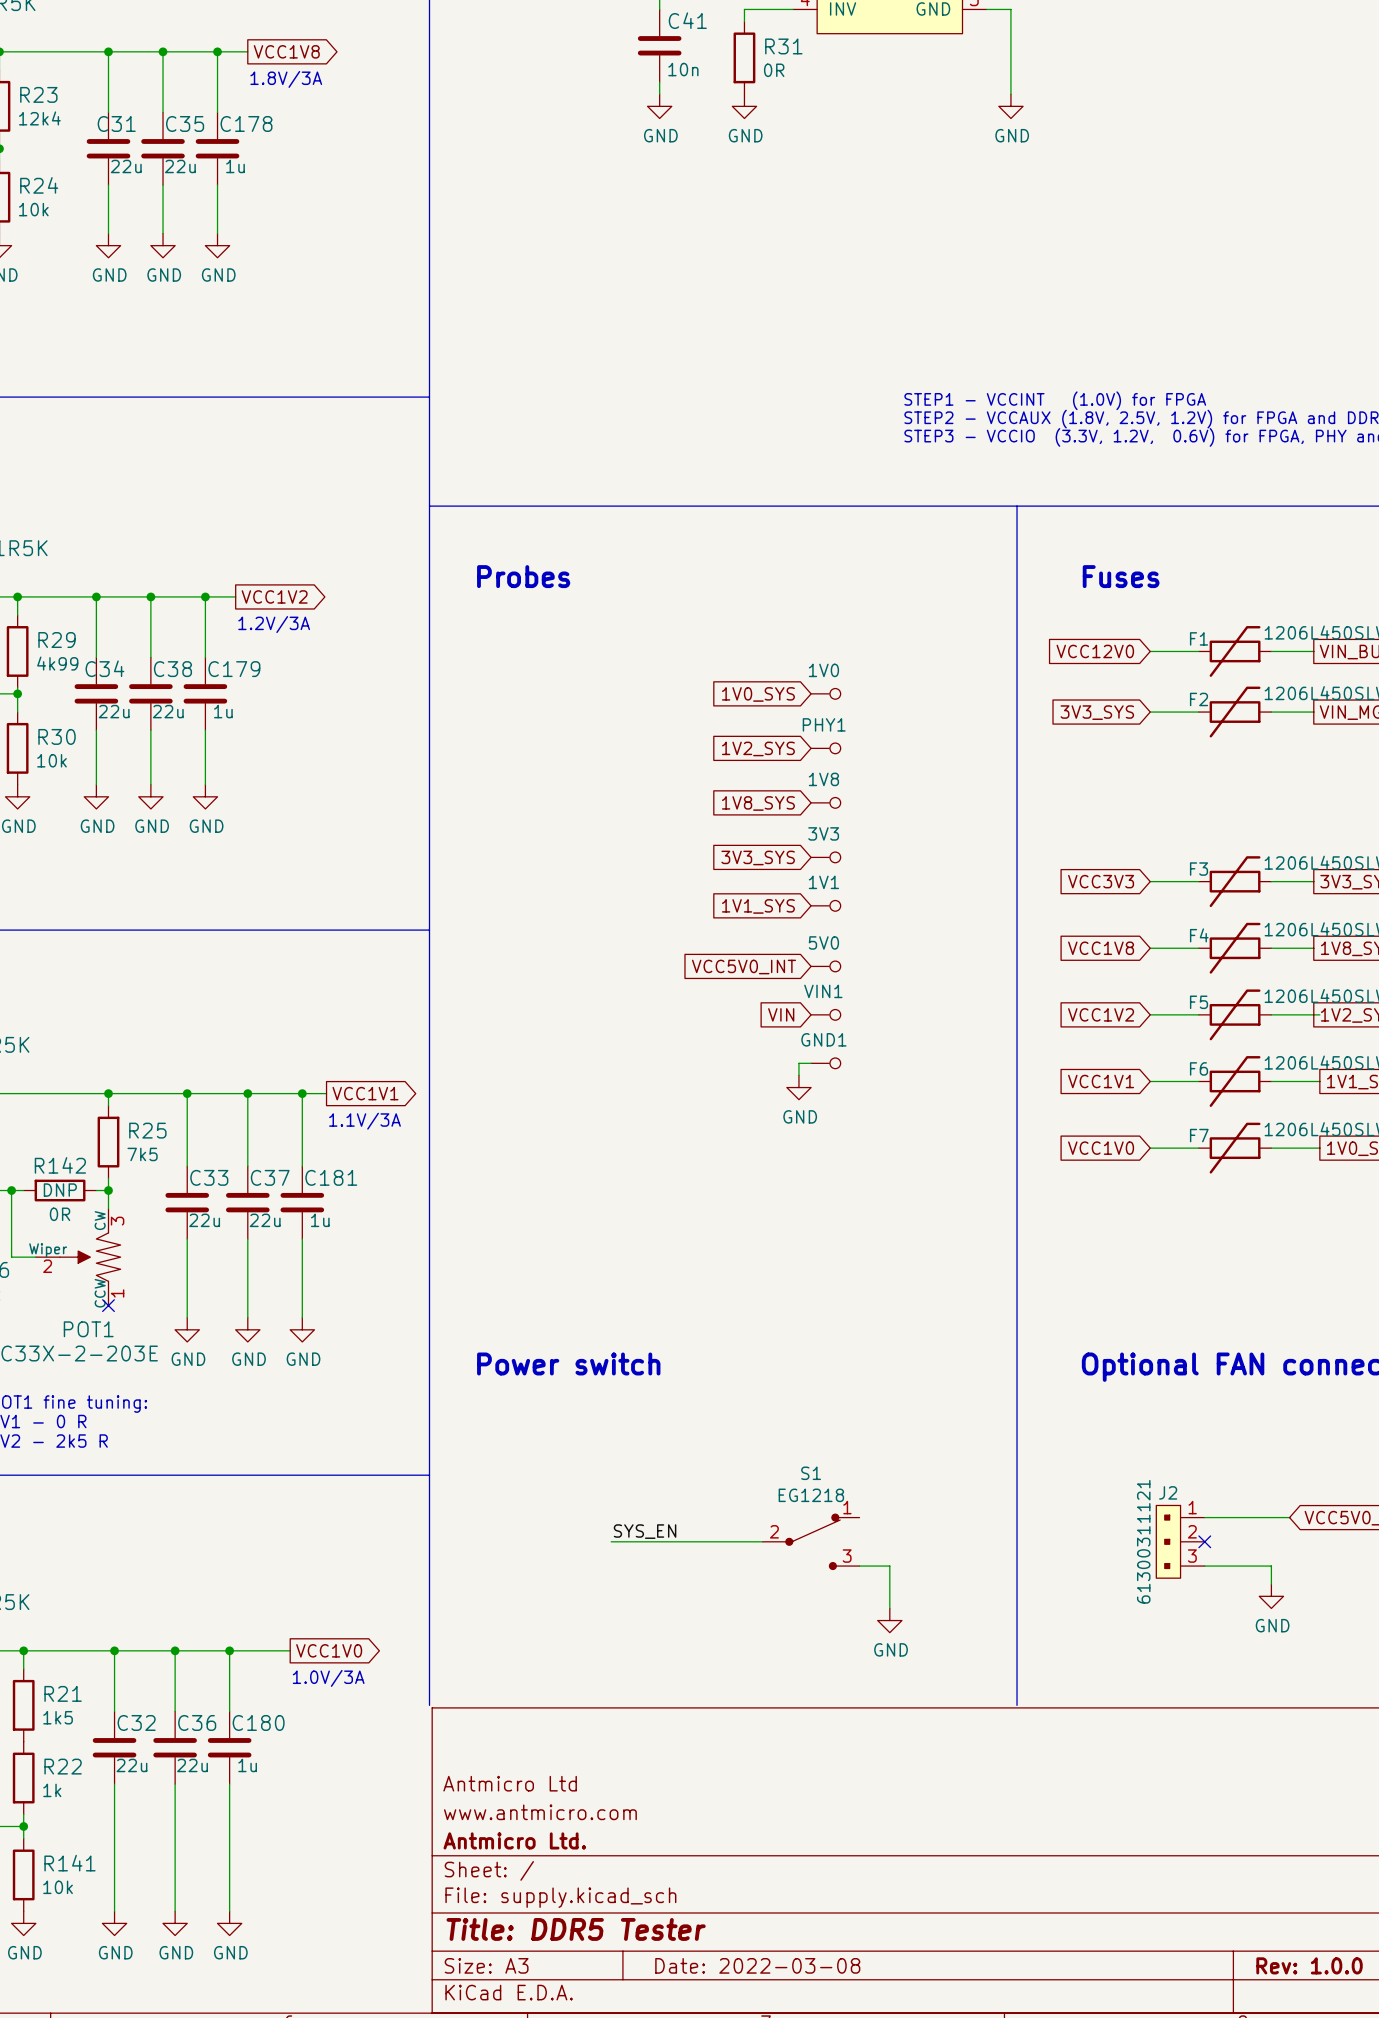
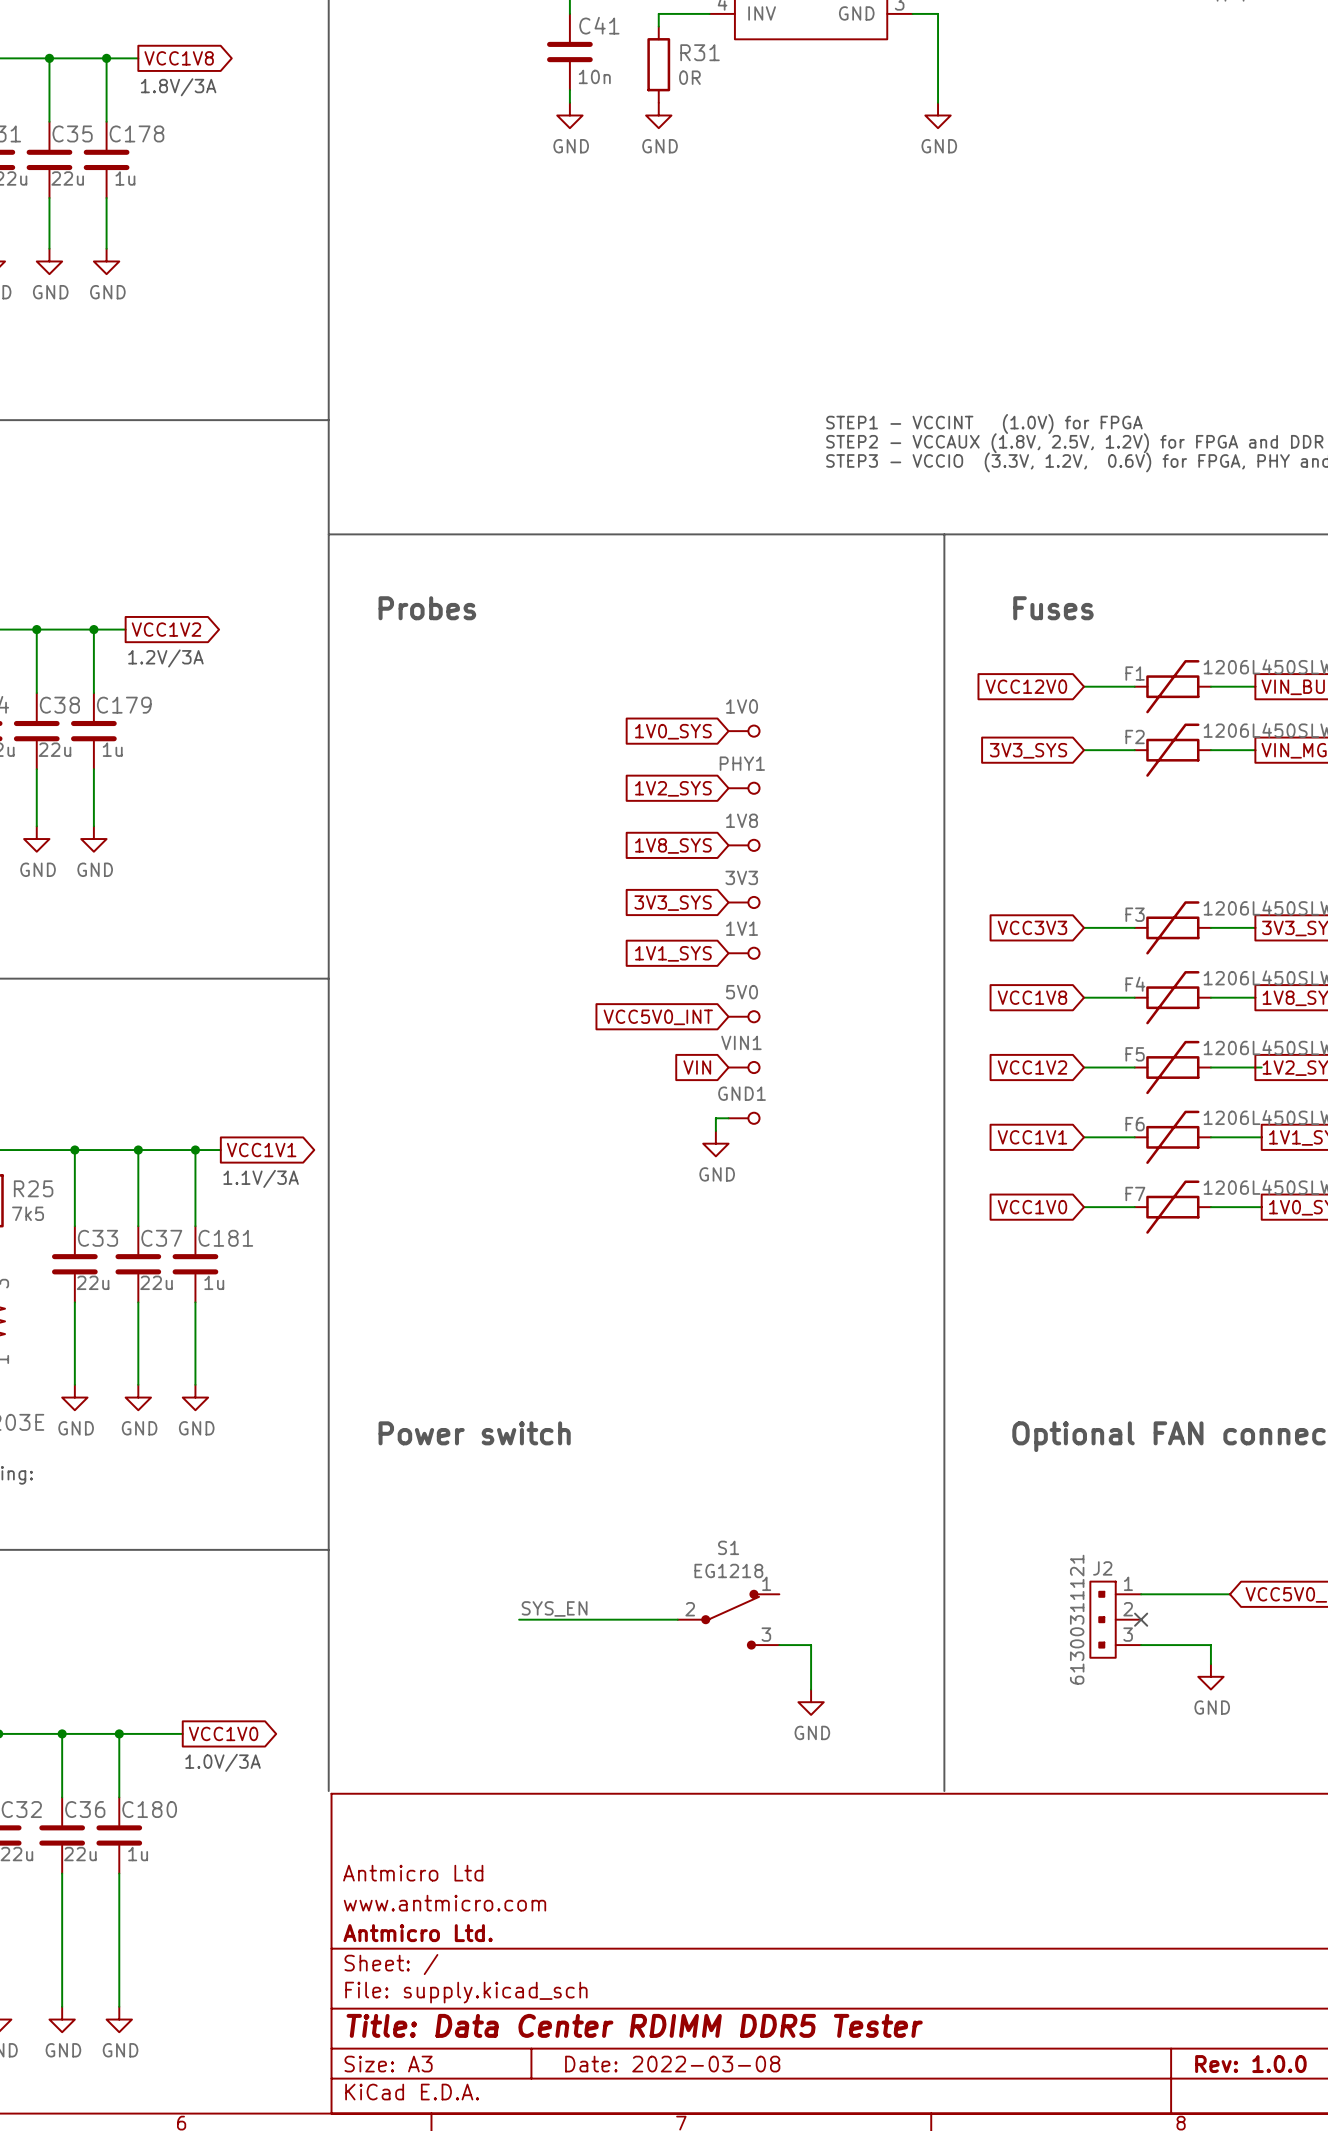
title block: Title: DDR5 Tester (576, 1929) -> Title: Data Center RDIMM DDR5 Tester (634, 2025)

